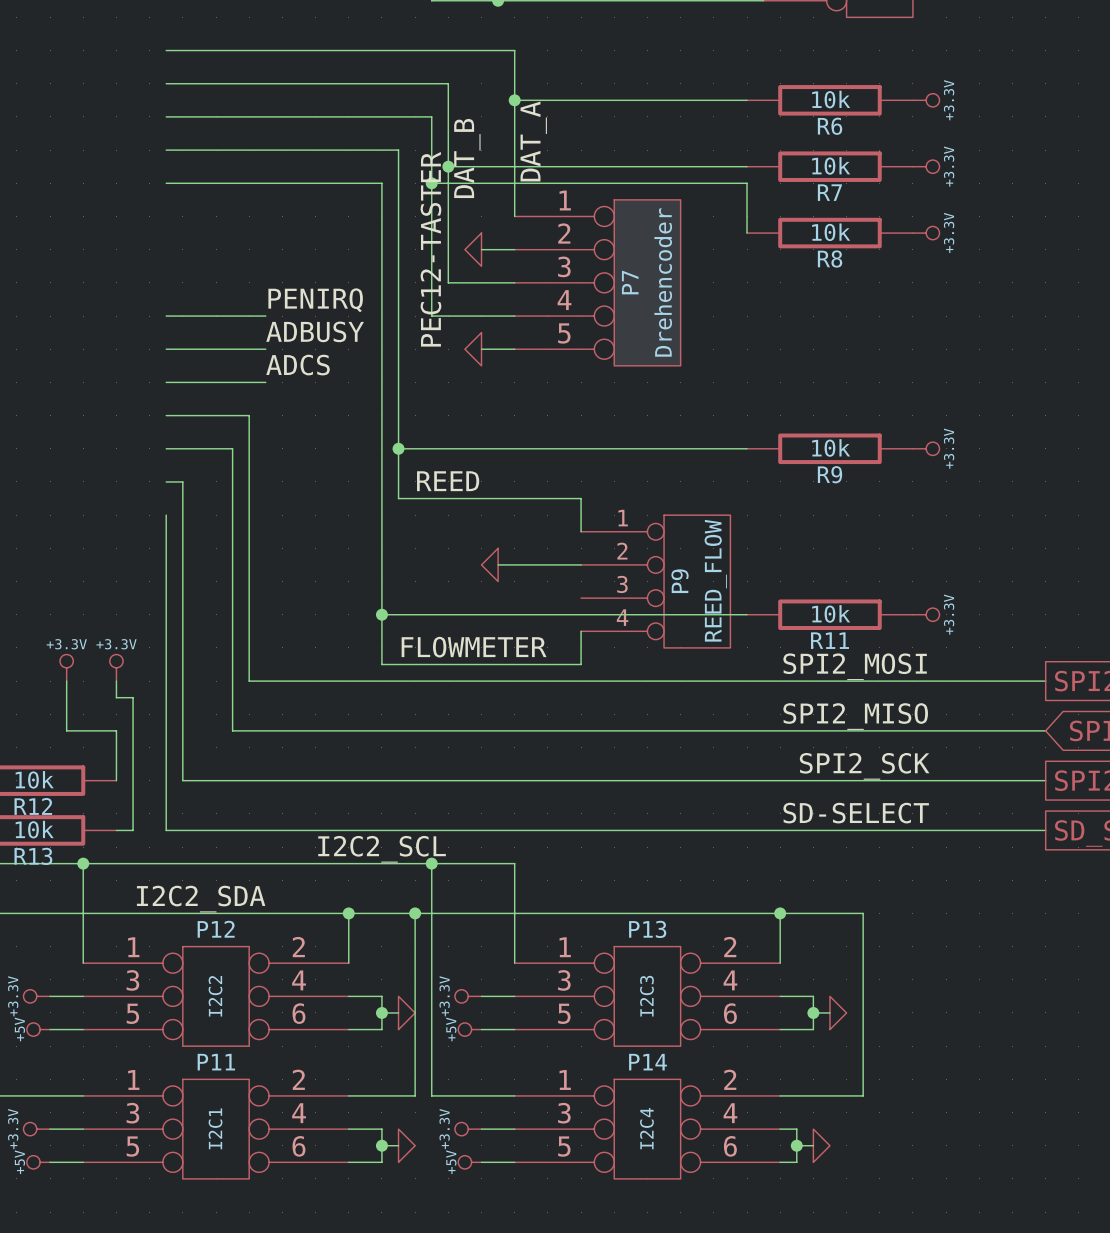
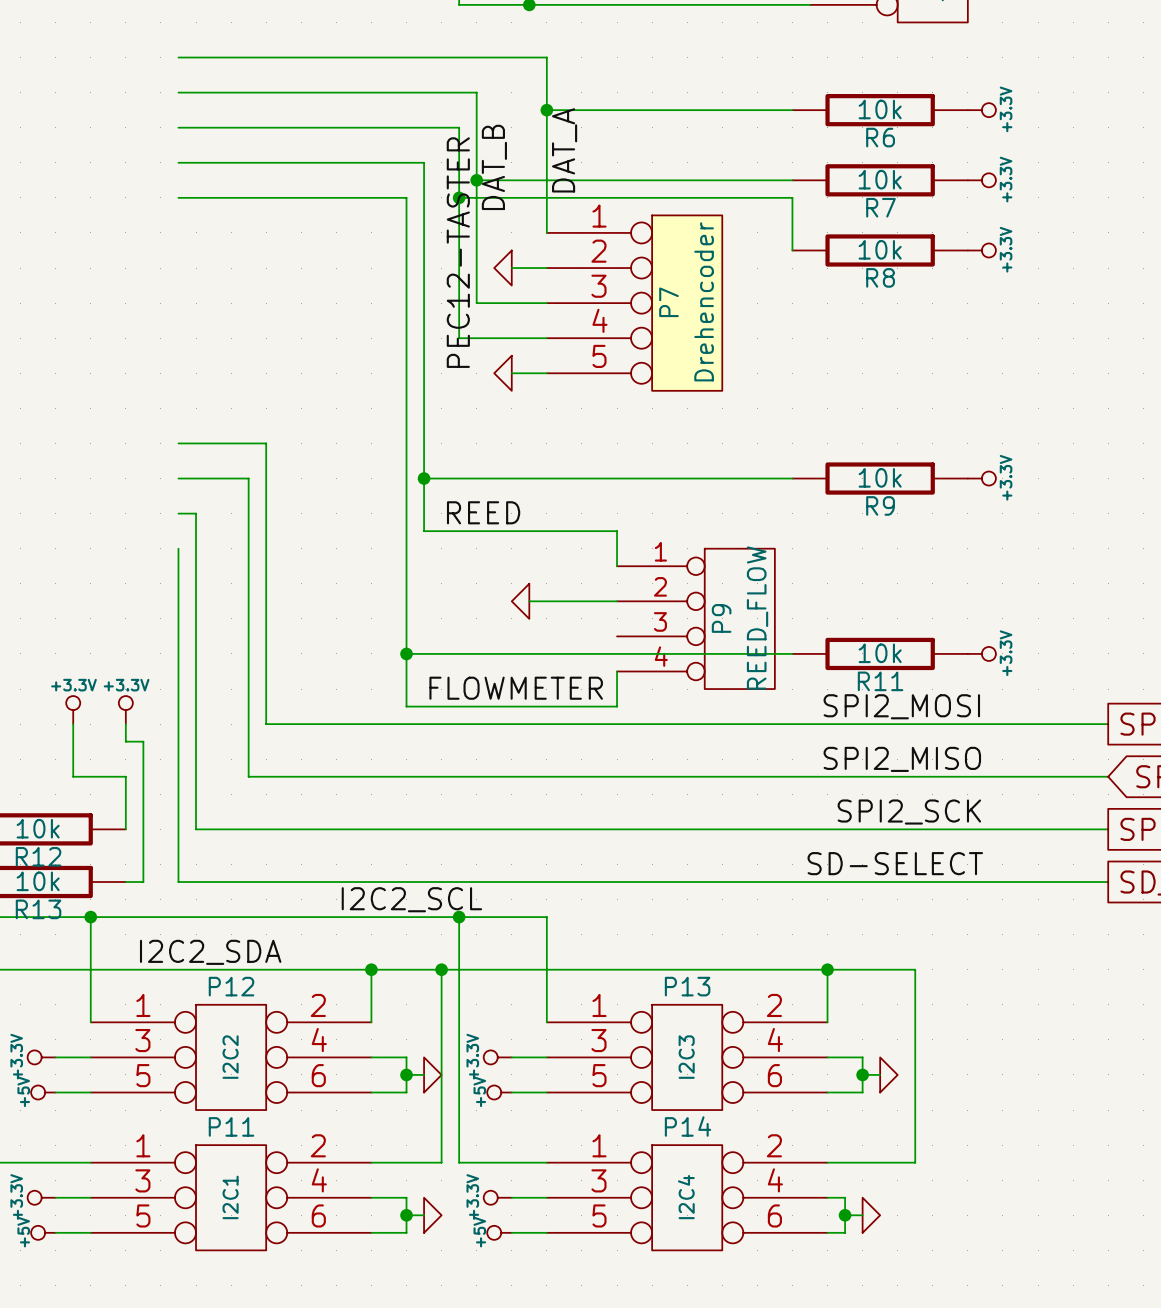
label: PENIRQ (315, 300) -> none
wire: (166, 316) (265, 316) -> none
label: ADBUSY (315, 331) -> none
wire: (166, 349) (265, 349) -> none
label: ADCS (298, 365) -> none
wire: (166, 382) (265, 382) -> none

